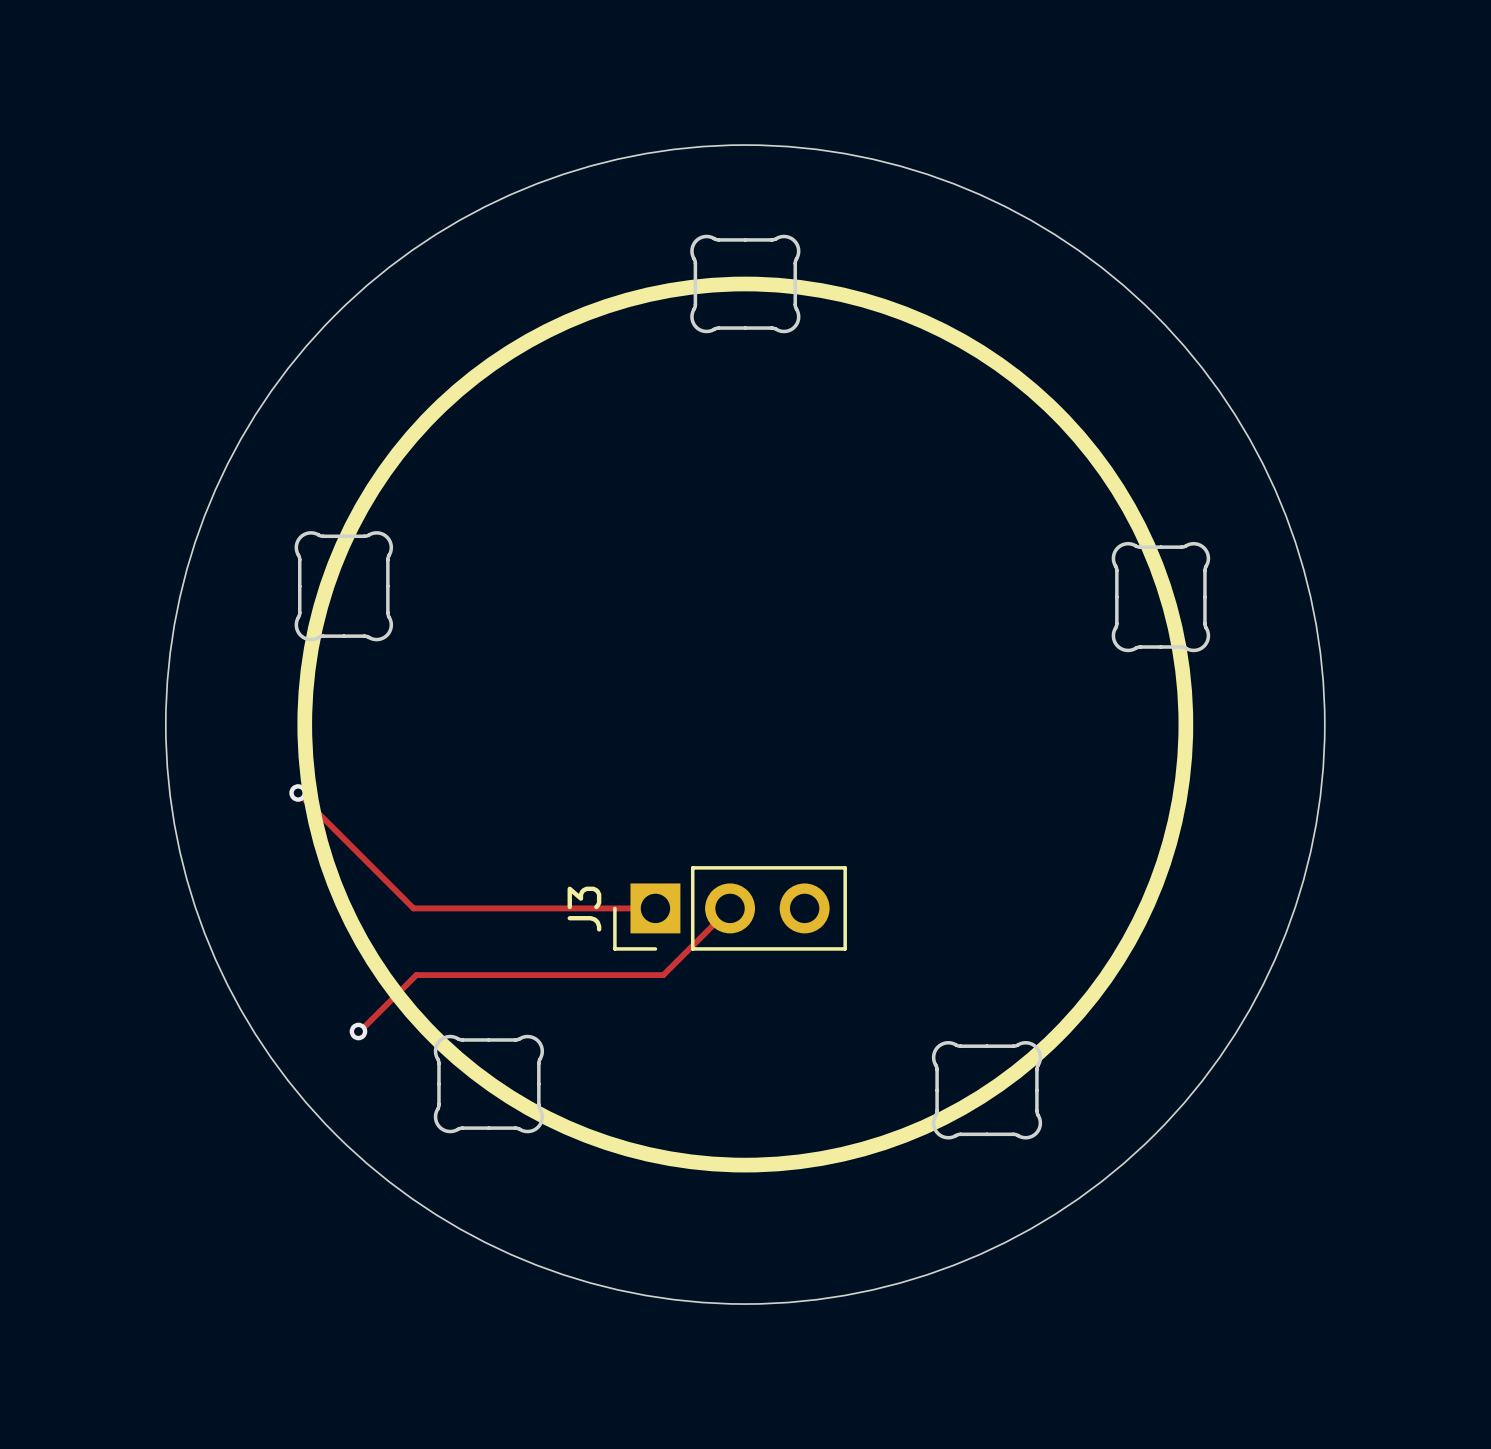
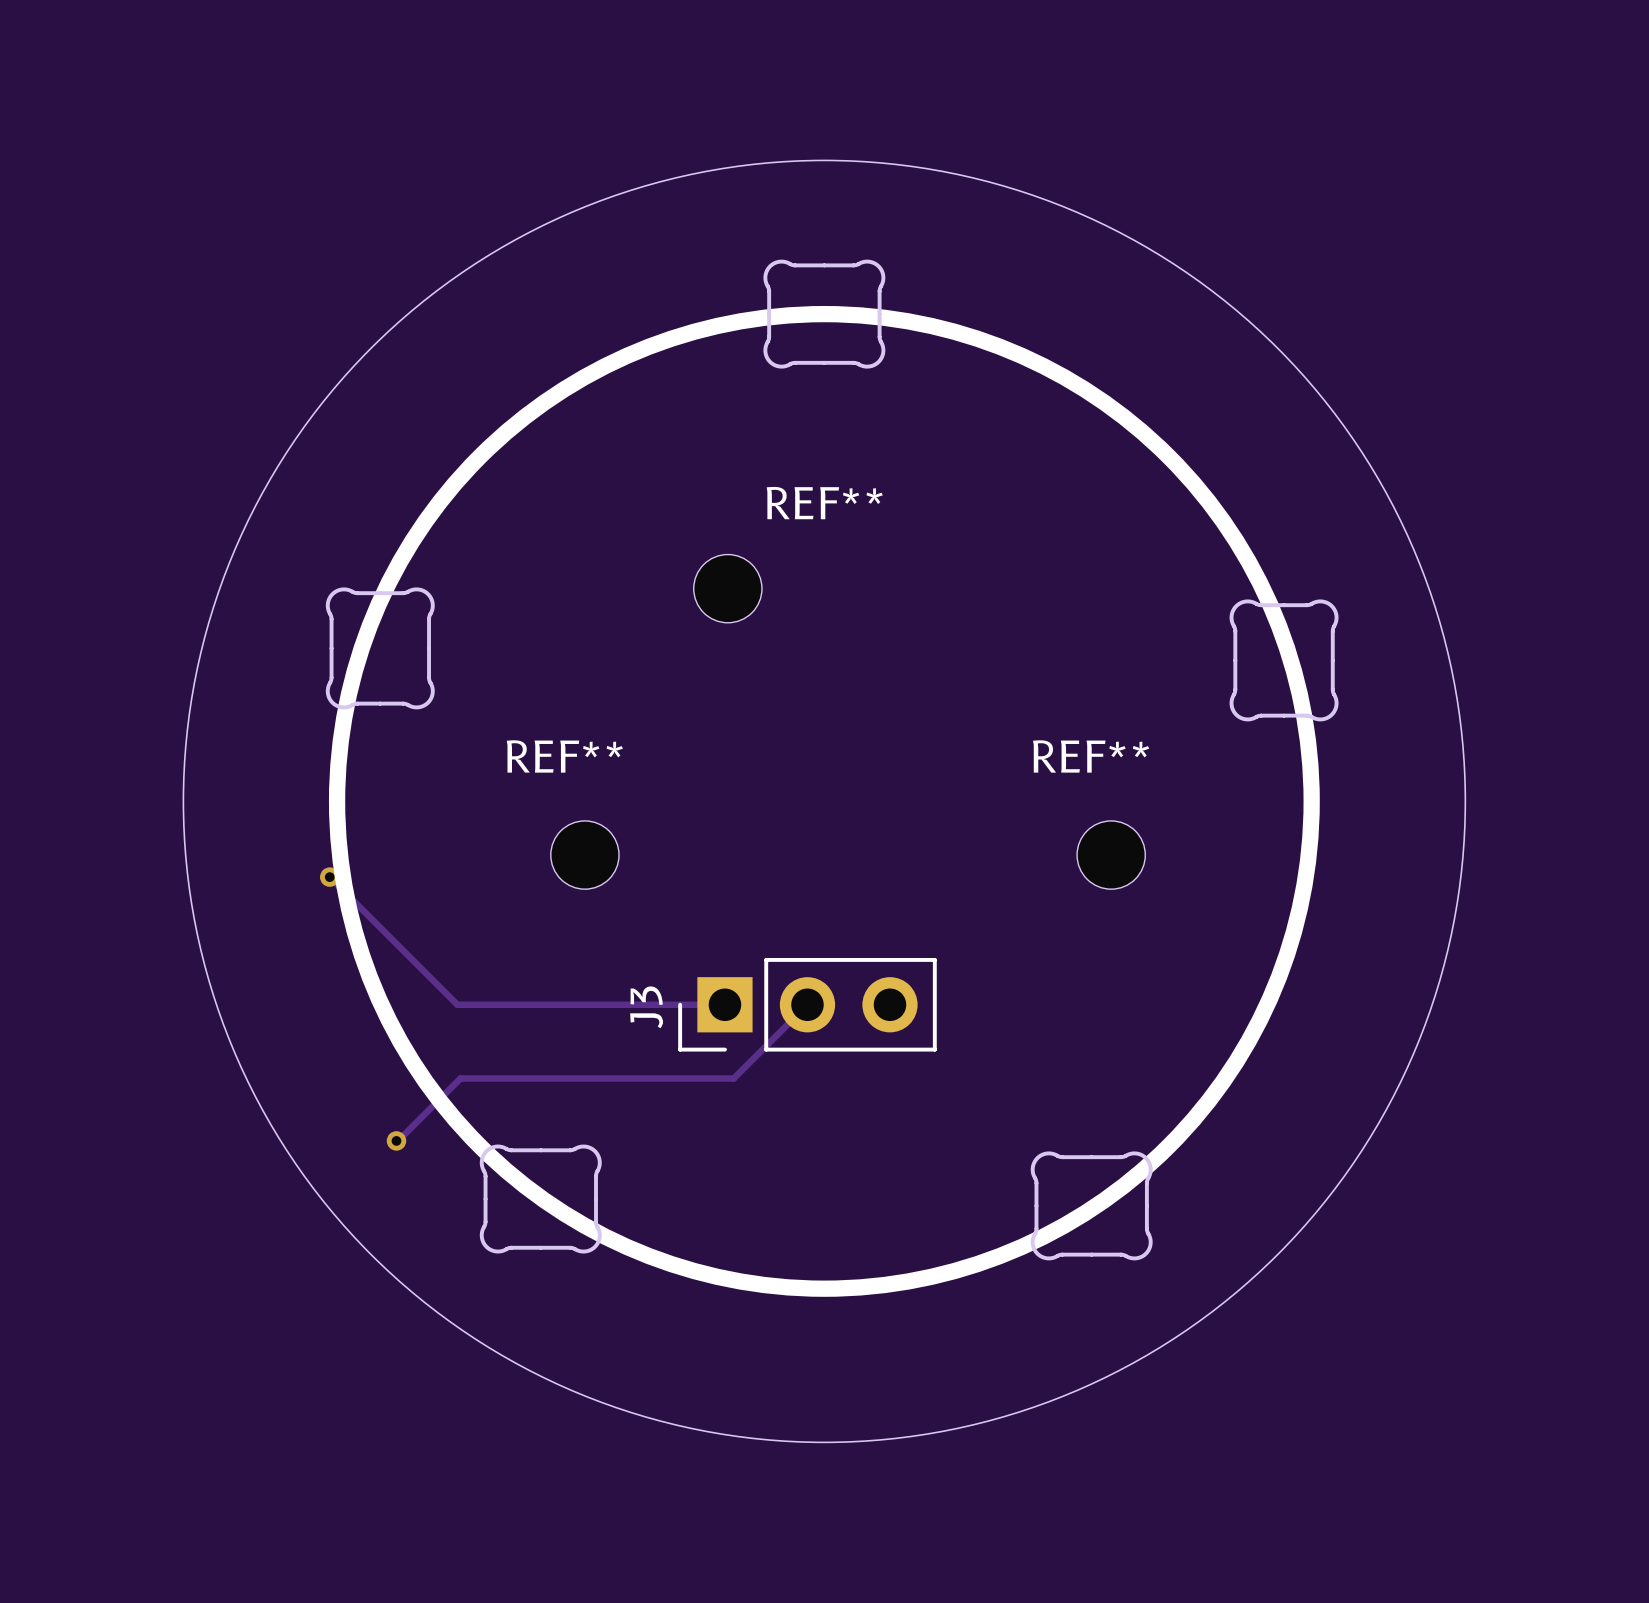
REF**: none -> (727, 588)
REF**: none -> (584, 855)
REF**: none -> (1111, 855)

